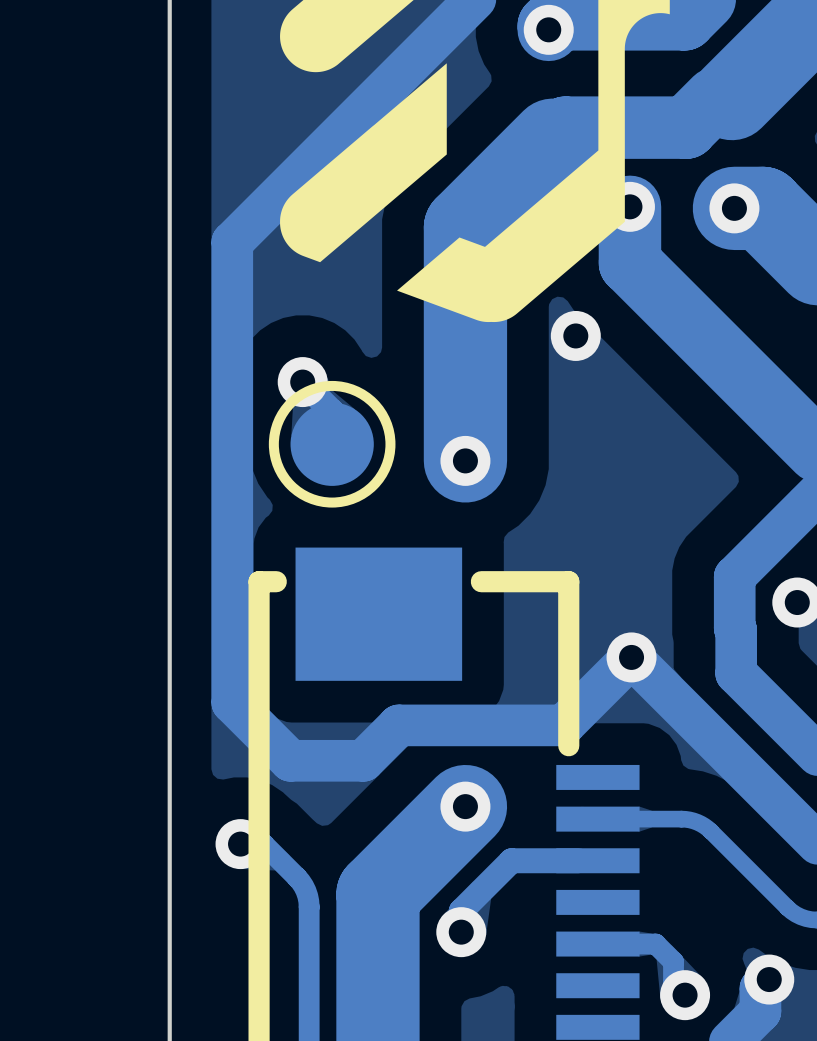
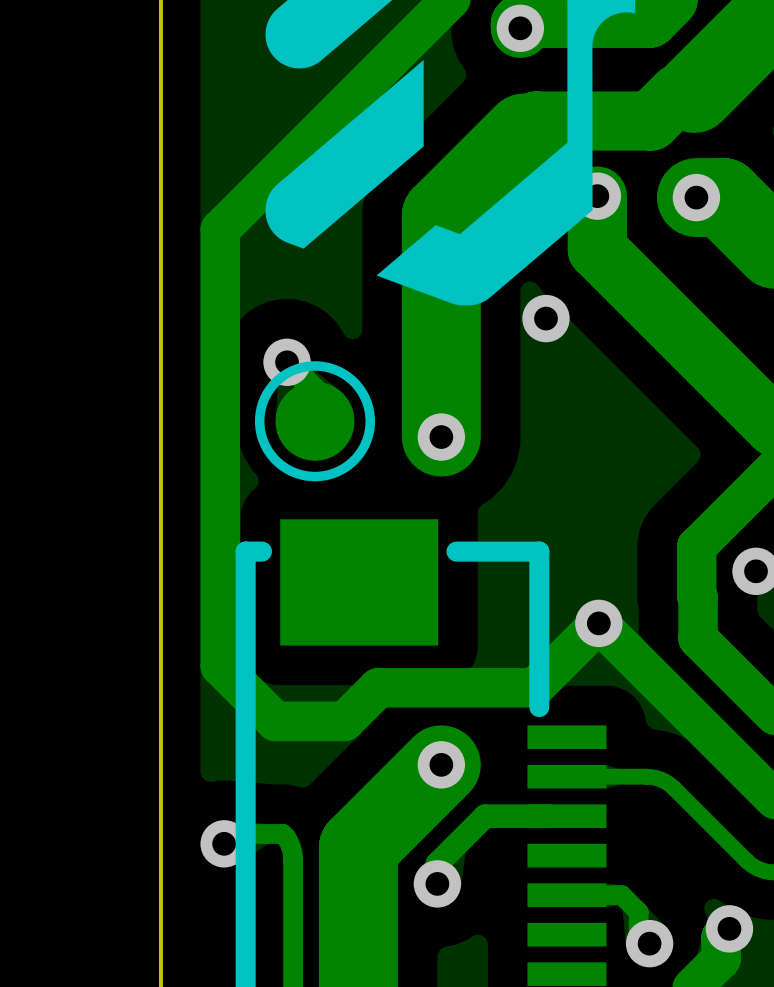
track: (240, 844) (263, 844) (300, 881) (307, 896) (309, 906) -> (224, 843) (234, 833) (282, 833) (289, 844) (293, 859)
via position: (240, 844) -> (224, 843)

